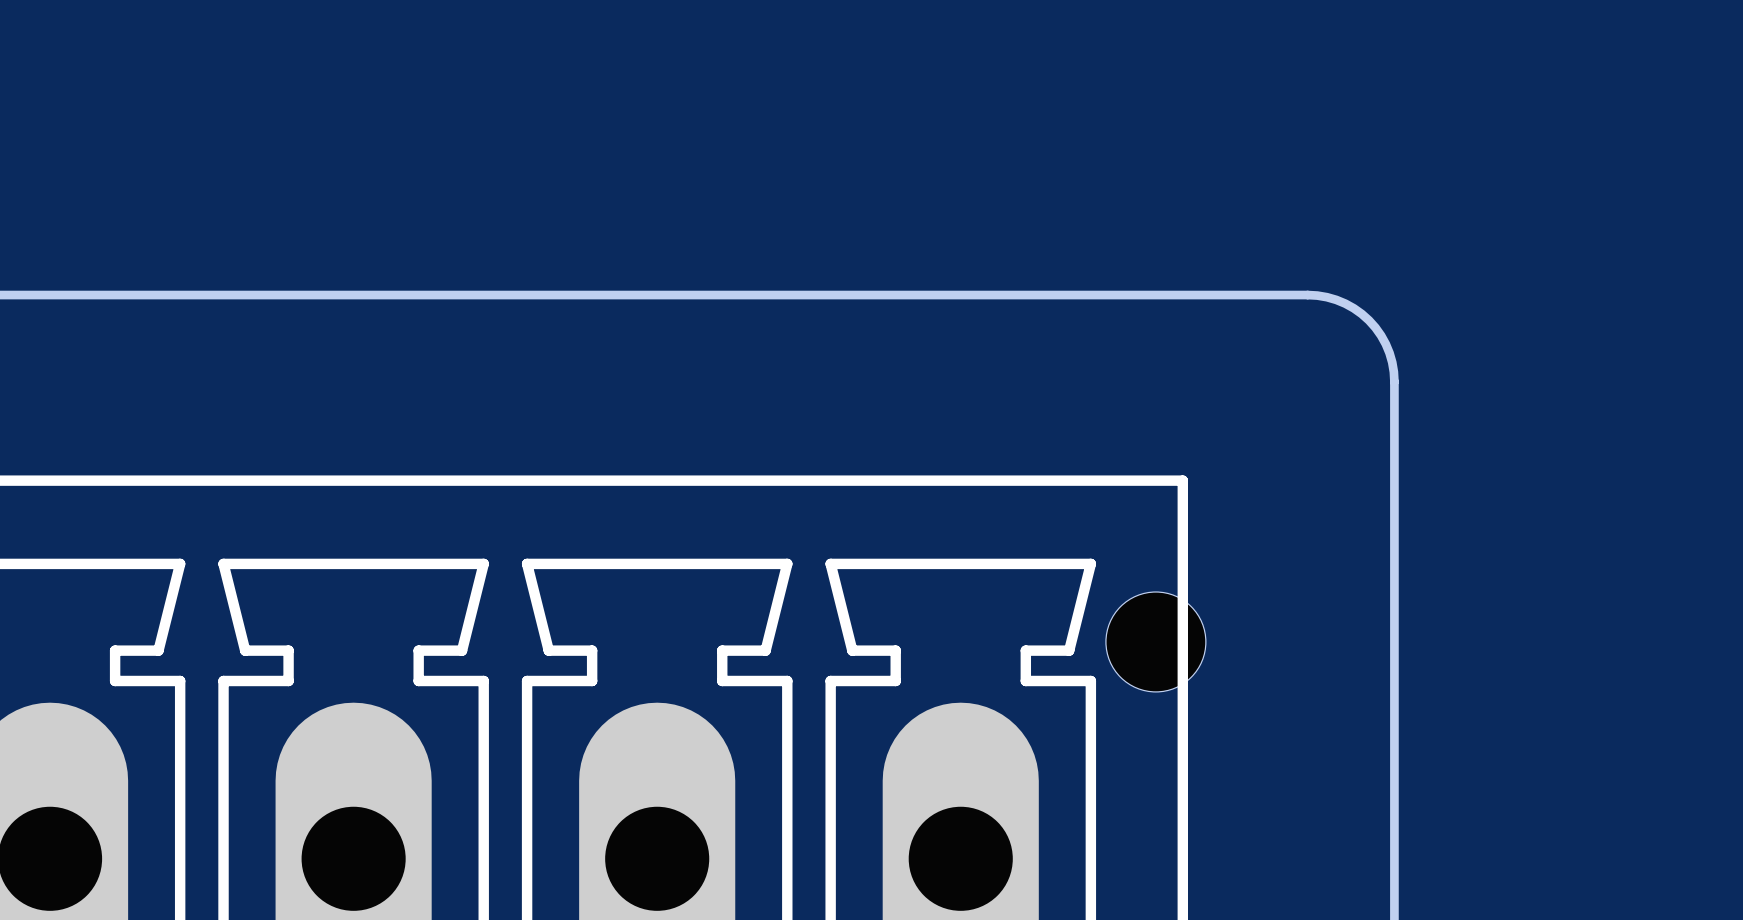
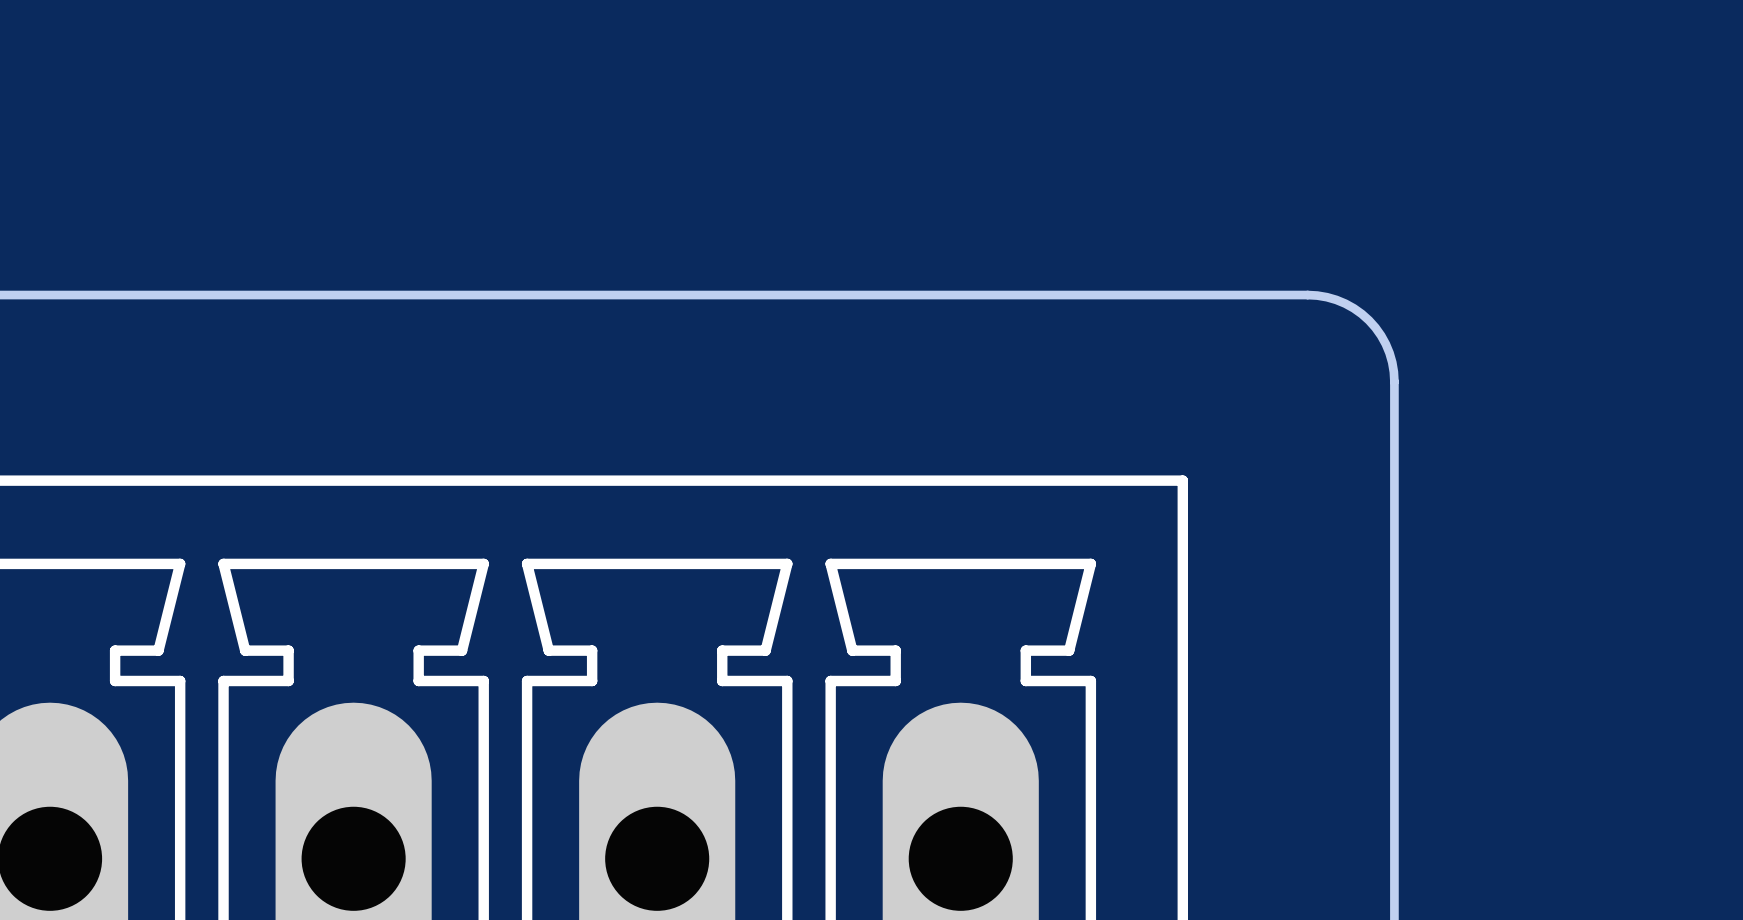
part: (1155, 641) -> none

